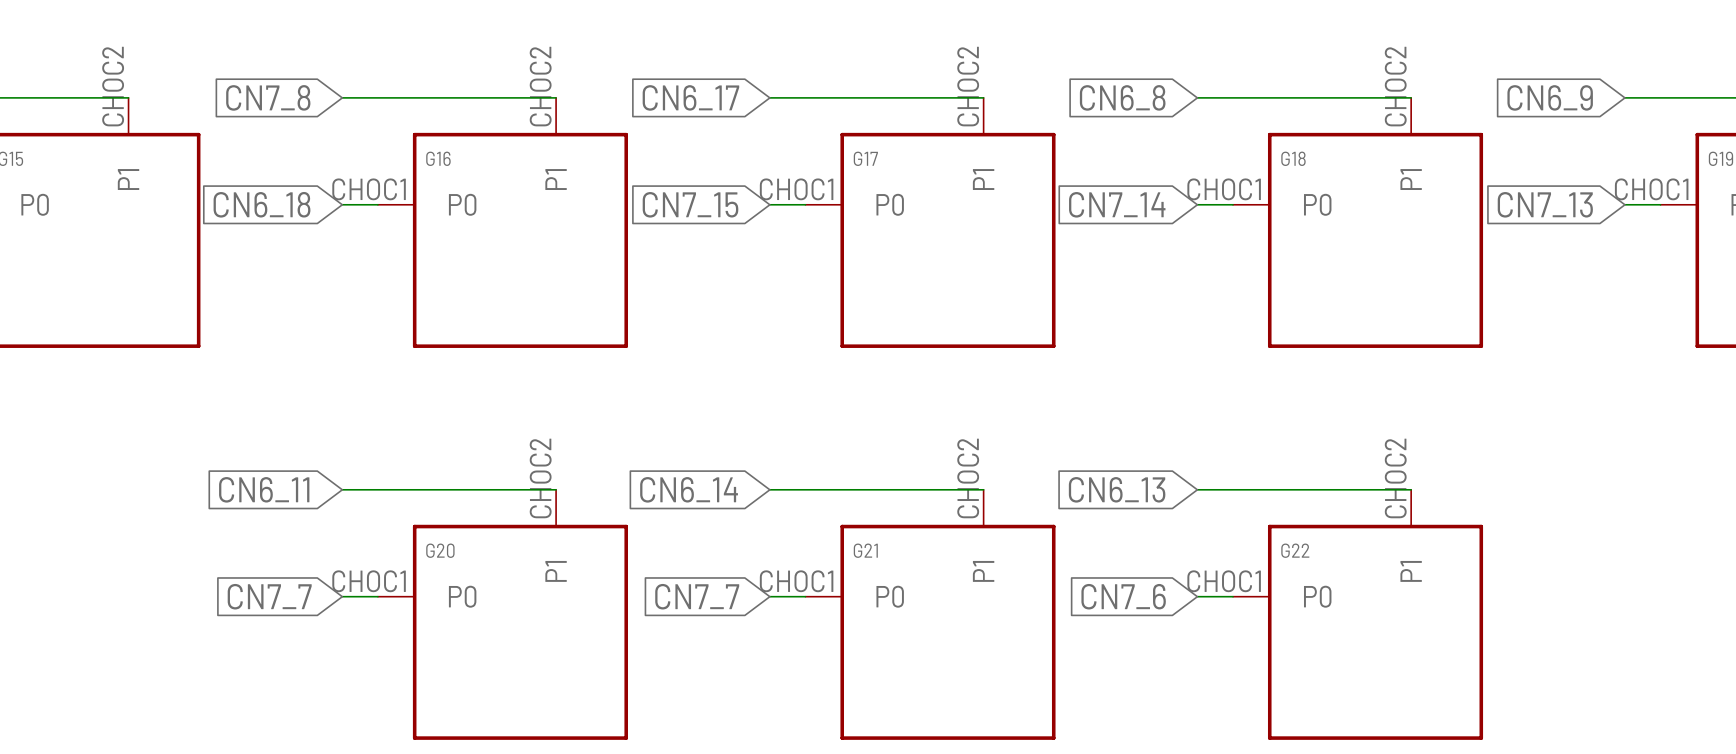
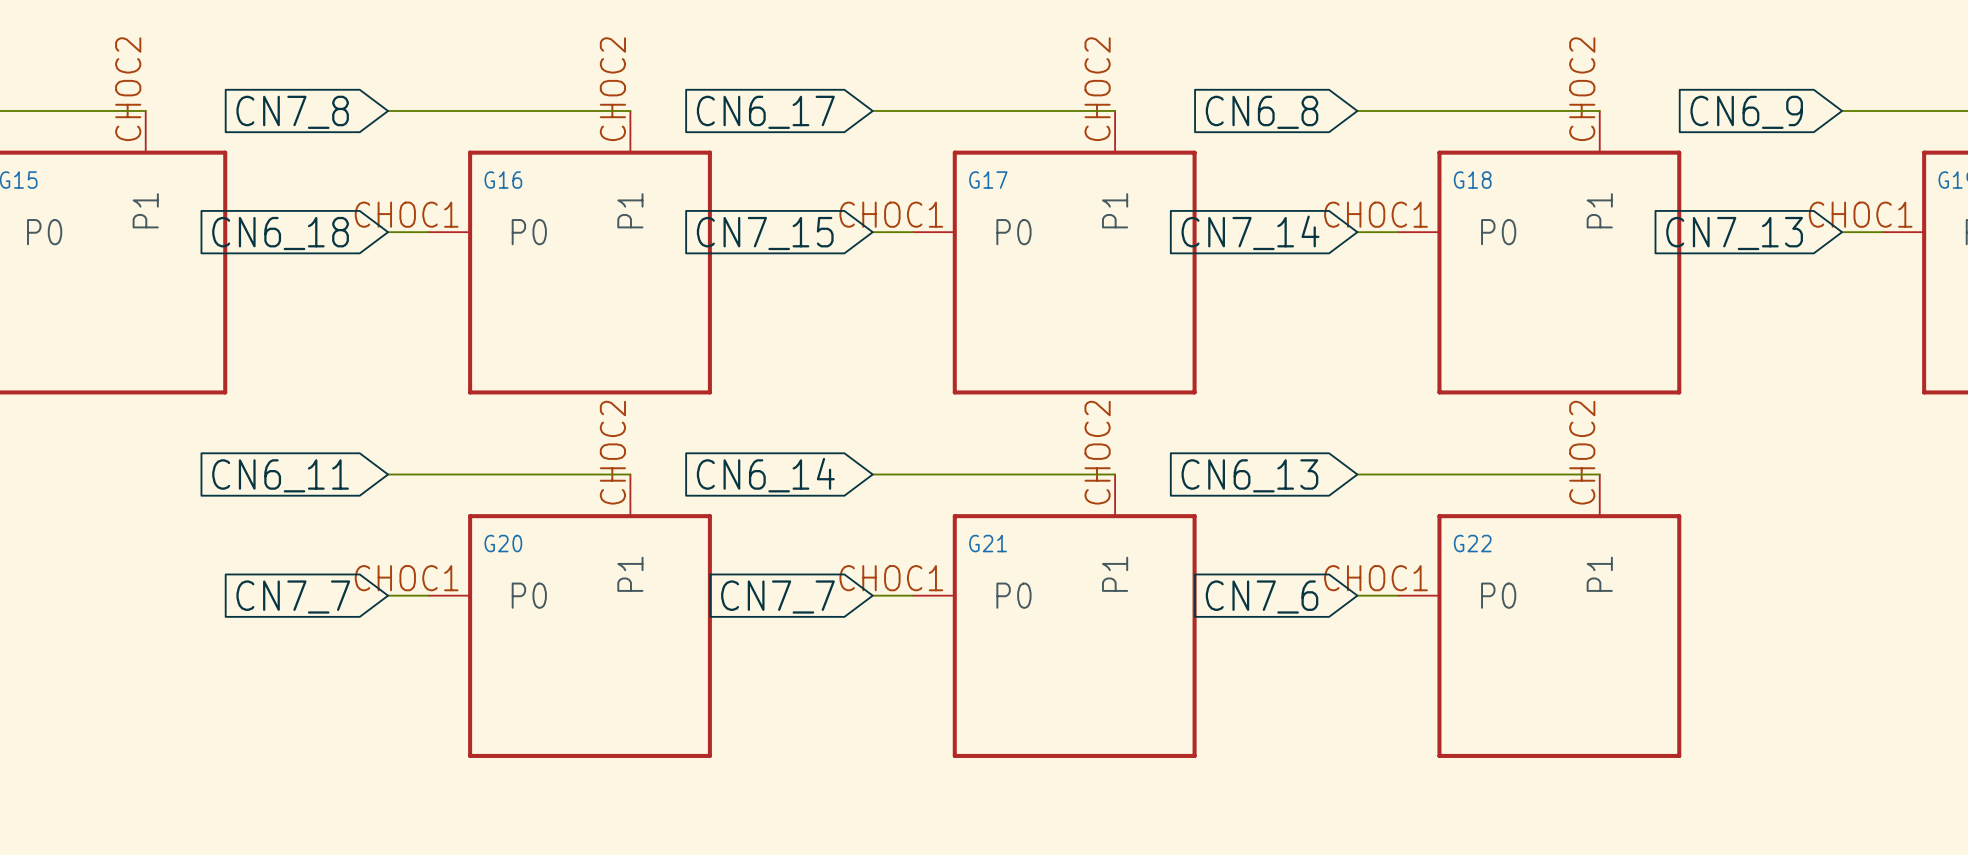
global label position: CN6_11 (264, 489) -> CN6_11 (280, 475)
wire: (342, 489) (556, 489) -> (388, 474) (630, 474)
global label position: CN6_14 (689, 489) -> CN6_14 (765, 475)
wire: (769, 489) (983, 489) -> (872, 474) (1115, 474)
global label position: CN6_13 (1117, 489) -> CN6_13 (1249, 475)
wire: (1197, 489) (1411, 489) -> (1357, 474) (1599, 474)
global label position: CN7_7 (269, 596) -> CN7_7 (293, 597)
wire: (342, 596) (377, 596) -> (388, 595) (428, 595)
global label position: CN7_7 (697, 596) -> CN7_7 (777, 597)
wire: (769, 596) (805, 596) -> (872, 595) (913, 595)
global label position: CN7_6 (1123, 596) -> CN7_6 (1262, 597)
wire: (1197, 596) (1233, 596) -> (1357, 595) (1397, 595)
G20 position: (502, 614) -> (570, 616)
G21 position: (930, 614) -> (1054, 616)
G22 position: (1358, 614) -> (1539, 616)

